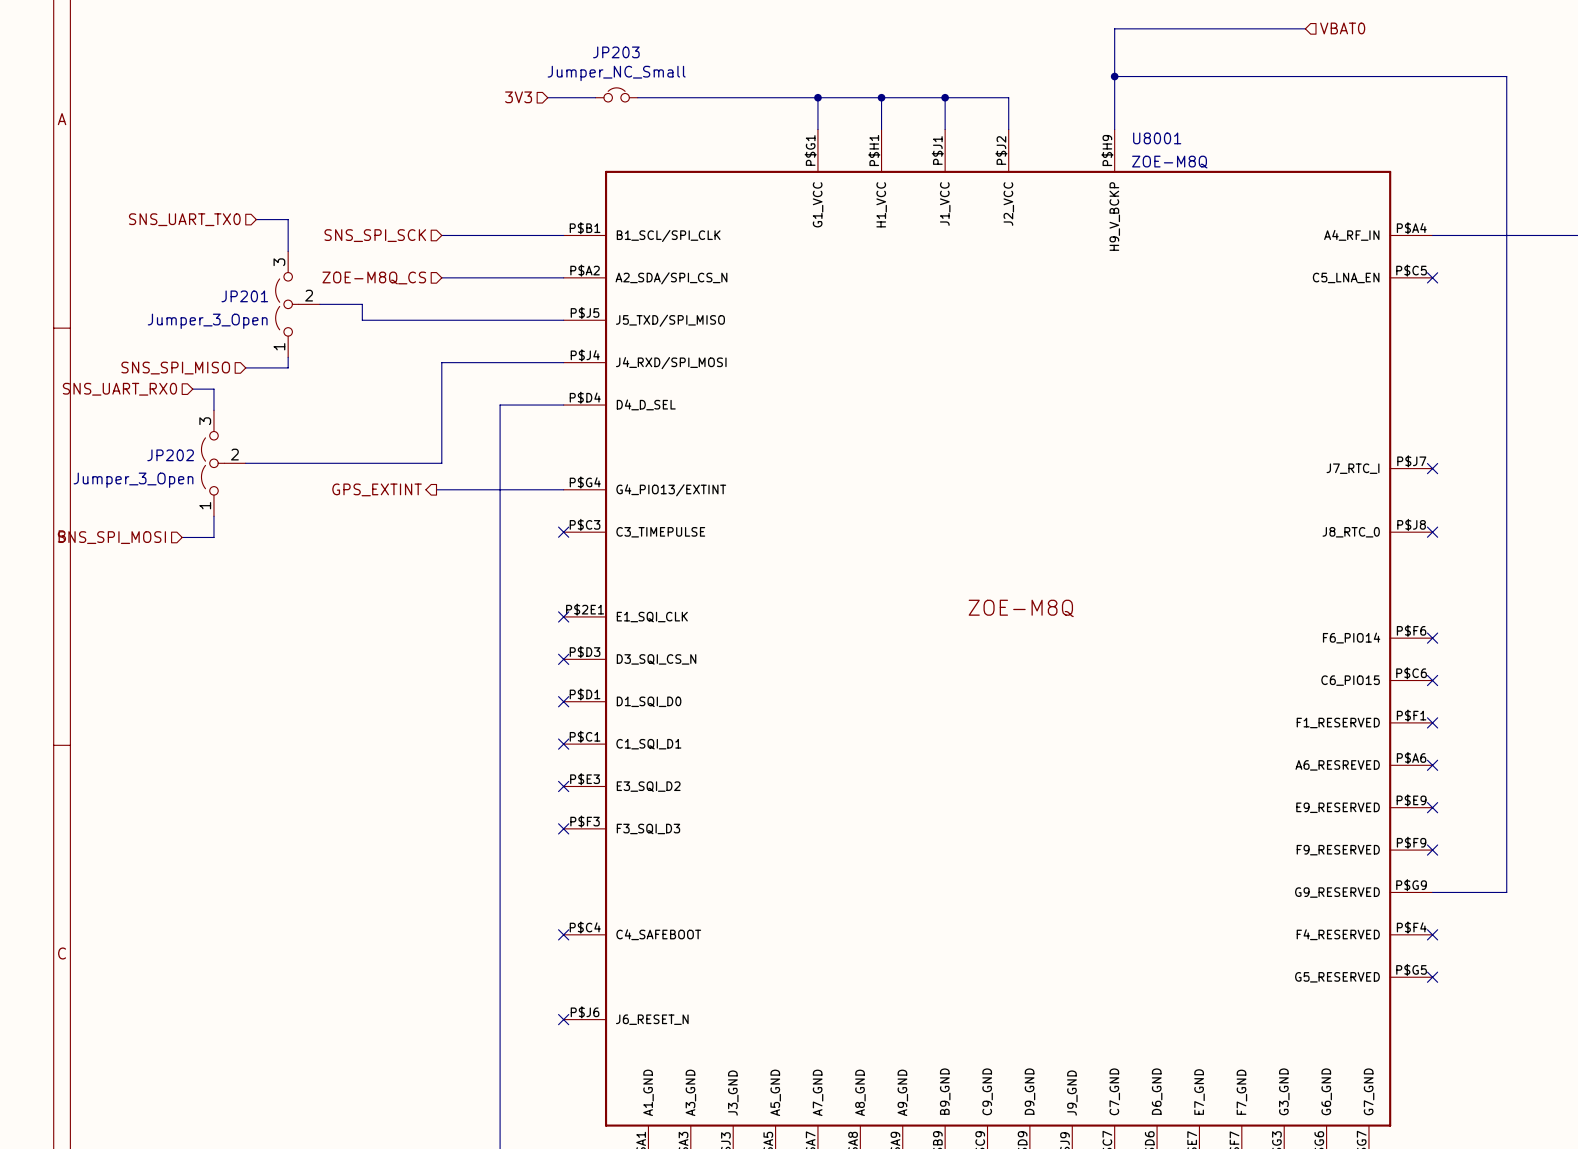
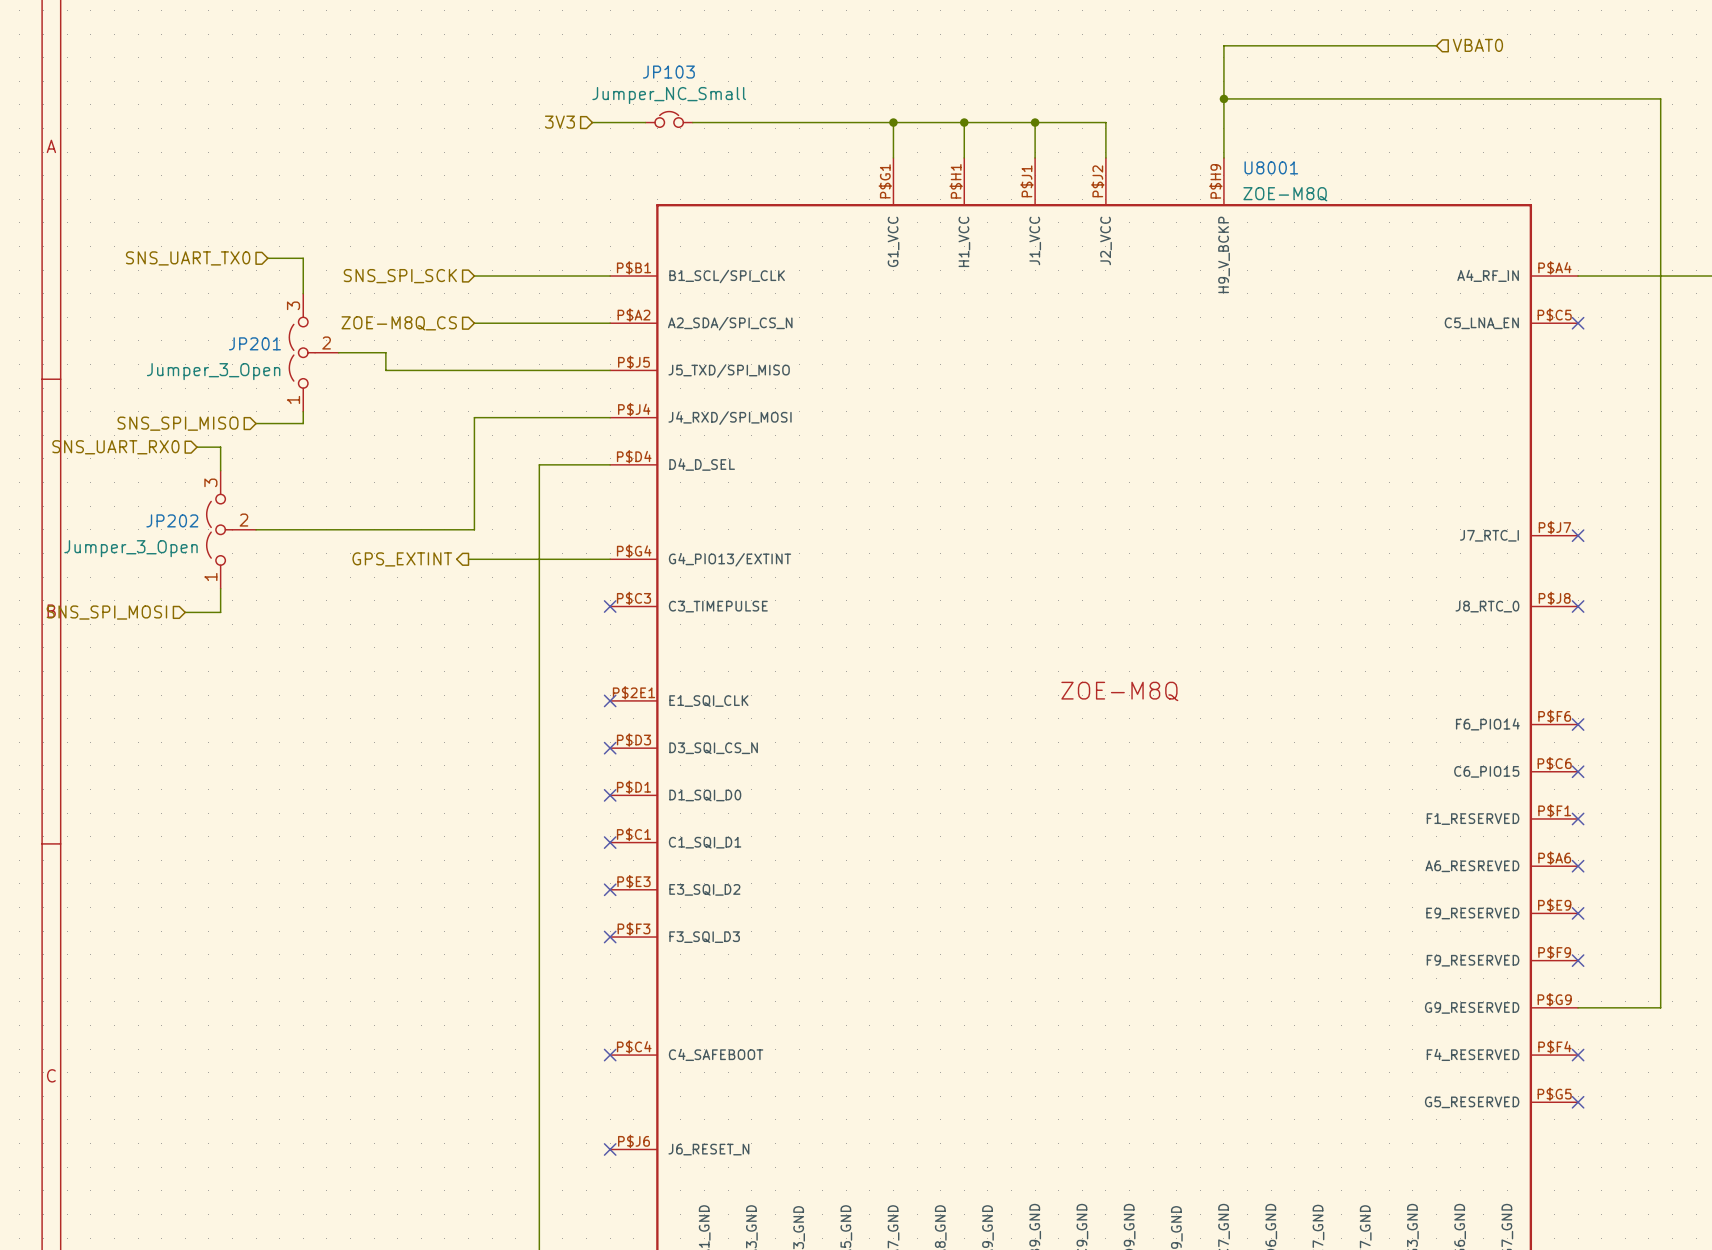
JP203 name: JP203 (616, 52) -> JP103 (668, 72)

